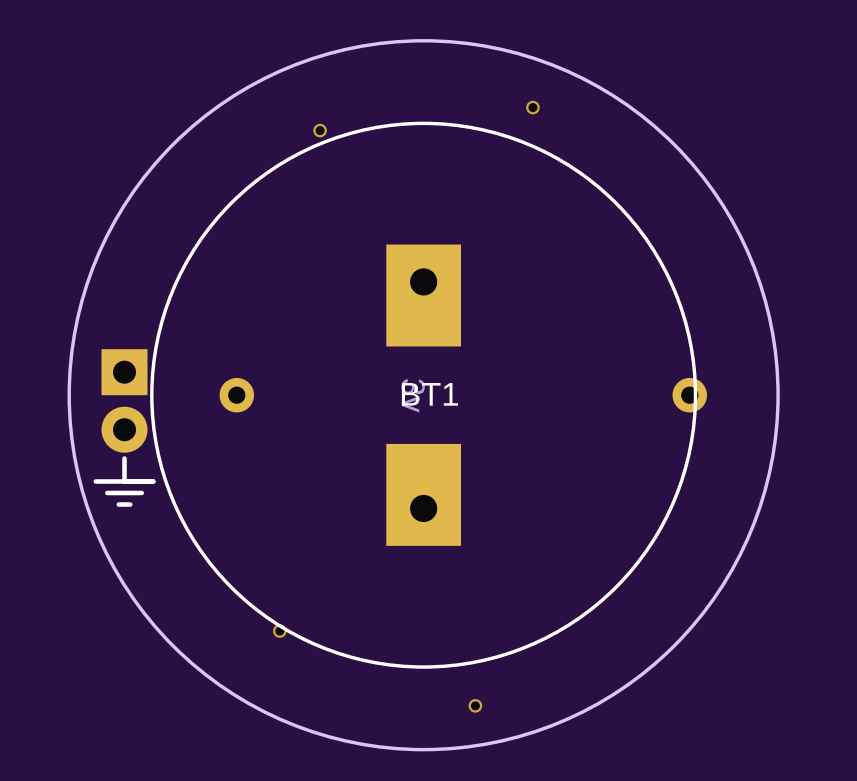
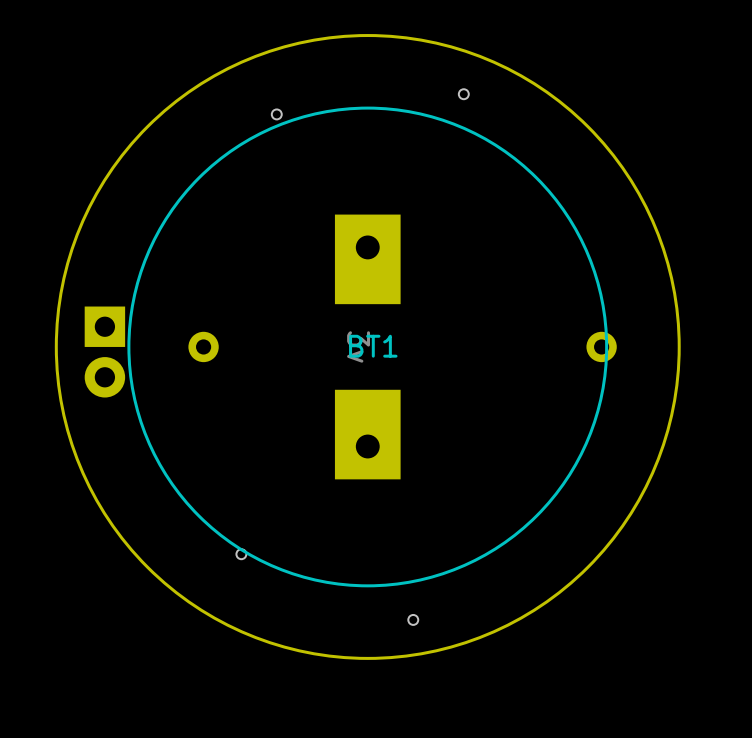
line: (124, 458) (124, 481) -> none
line: (153, 481) (95, 481) -> none
line: (141, 493) (107, 493) -> none
line: (130, 504) (118, 504) -> none

